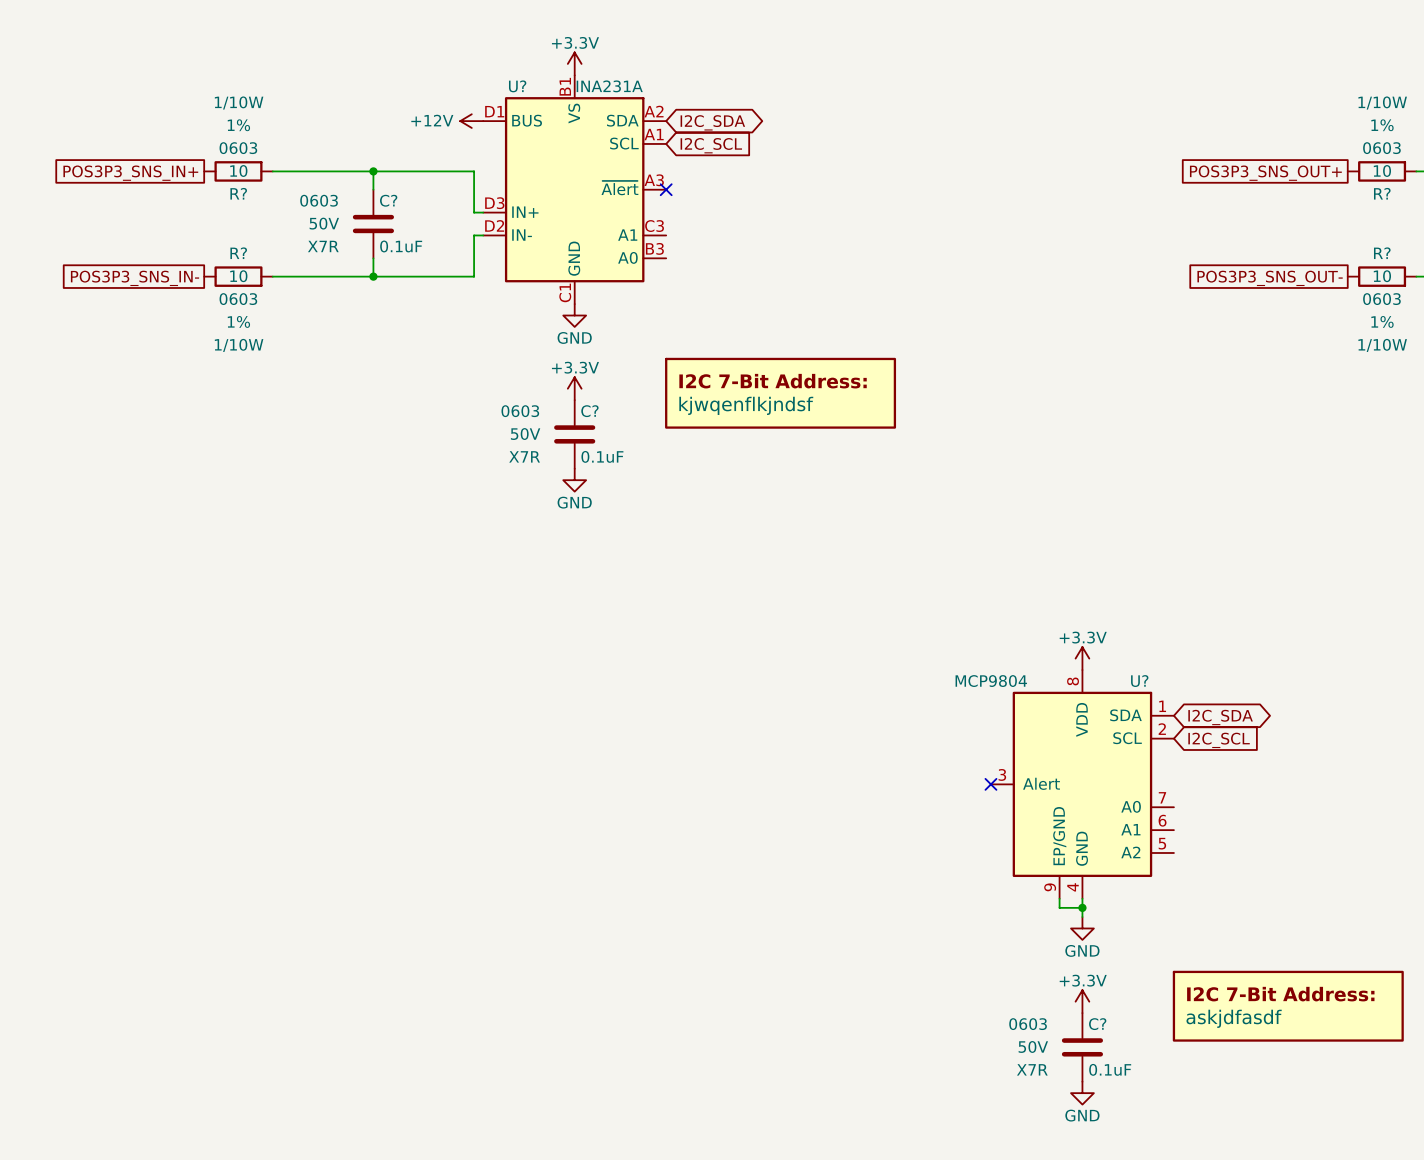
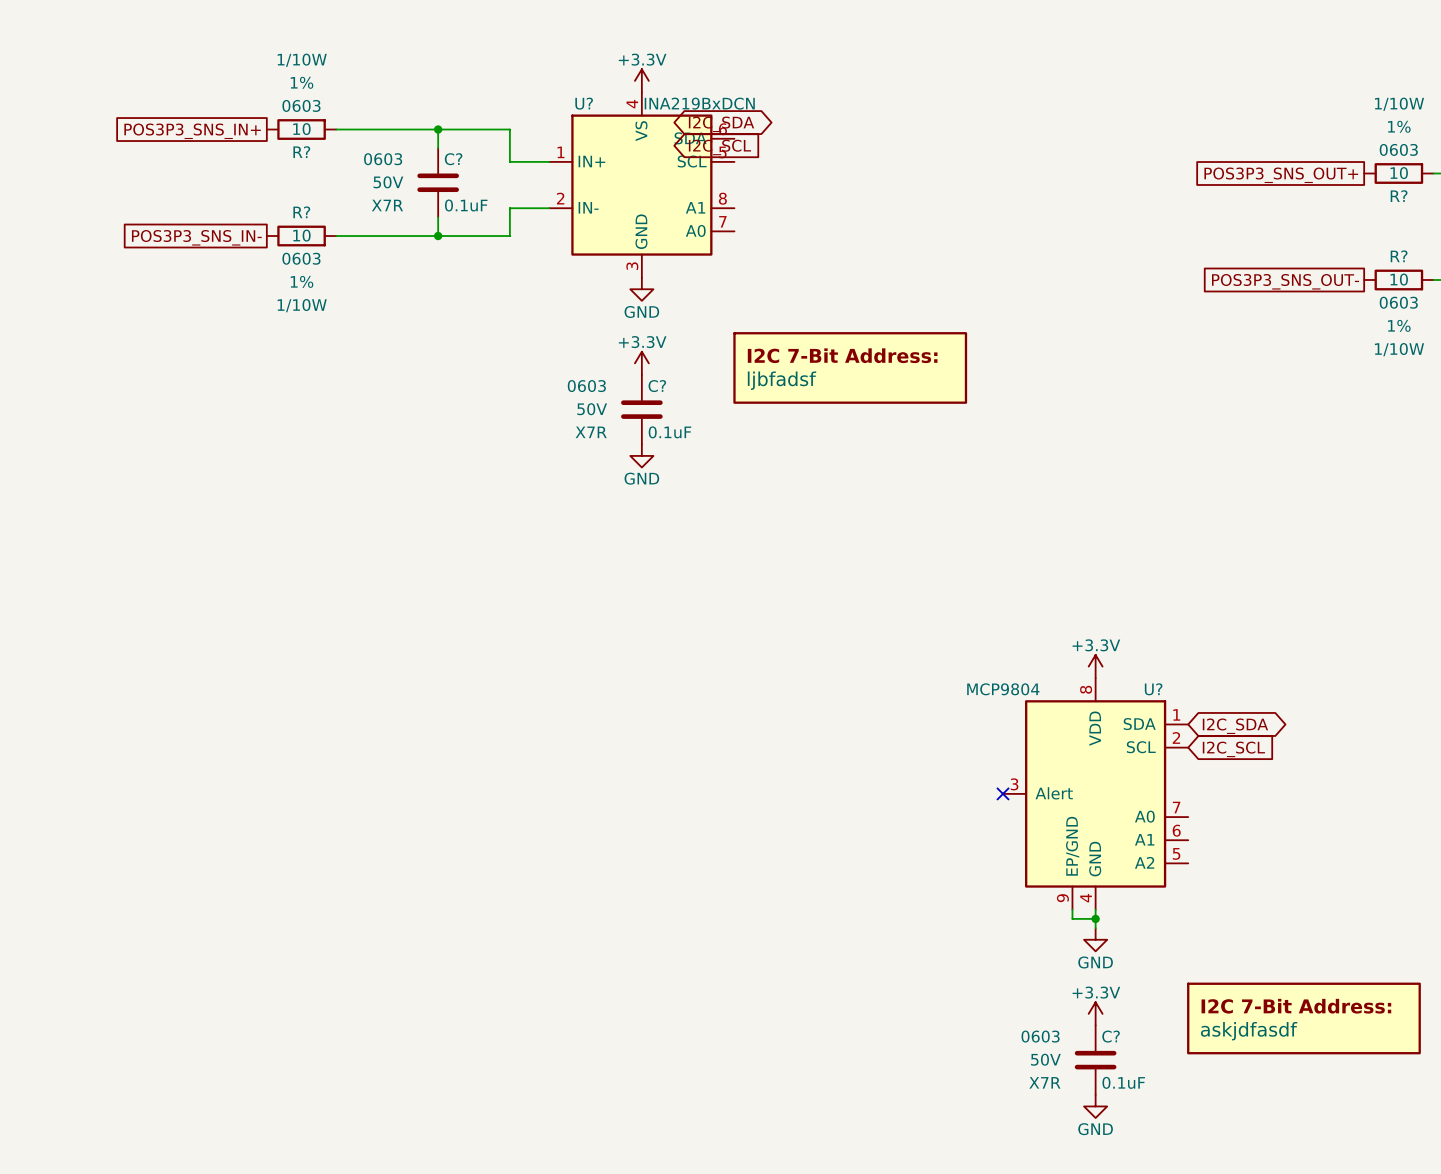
power symbol position: +3.3V (574, 63) -> +3.3V (641, 80)
power symbol: +12V (471, 121) -> none
R?: none -> 10 (301, 129)
wire: none -> (336, 129) (509, 129) (509, 161) (549, 161)
junction: none -> (438, 129)
R?: 10 (238, 171) -> none
wire: (272, 171) (474, 171) (474, 212) (483, 212) -> none
wire: (373, 171) (373, 189) -> (438, 129) (438, 148)
junction: (373, 171) -> none
global label position: POS3P3_SNS_IN+ (130, 173) -> POS3P3_SNS_IN+ (192, 131)
U?: none -> INA219BxDCN (641, 185)
U?: INA231A (574, 189) -> none
no-connect mark: (666, 189) -> none
wire: none -> (549, 208) (509, 208) (509, 236) (336, 236)
C? position: (373, 224) -> (438, 182)
R?: none -> 10 (301, 236)
junction: none -> (438, 236)
wire: (483, 235) (474, 235) (474, 276) (272, 276) -> none
wire: (373, 258) (373, 276) -> (438, 217) (438, 236)
R?: 10 (238, 276) -> none
junction: (373, 276) -> none
global label position: POS3P3_SNS_IN- (135, 278) -> POS3P3_SNS_IN- (196, 237)
power symbol position: GND (574, 315) -> GND (641, 289)
part: none -> ljbfadsf (850, 367)
power symbol position: +3.3V (574, 388) -> +3.3V (641, 363)
part: kjwqenflkjndsf (780, 393) -> none
C? position: (574, 434) -> (641, 409)
power symbol position: GND (574, 480) -> GND (641, 455)

